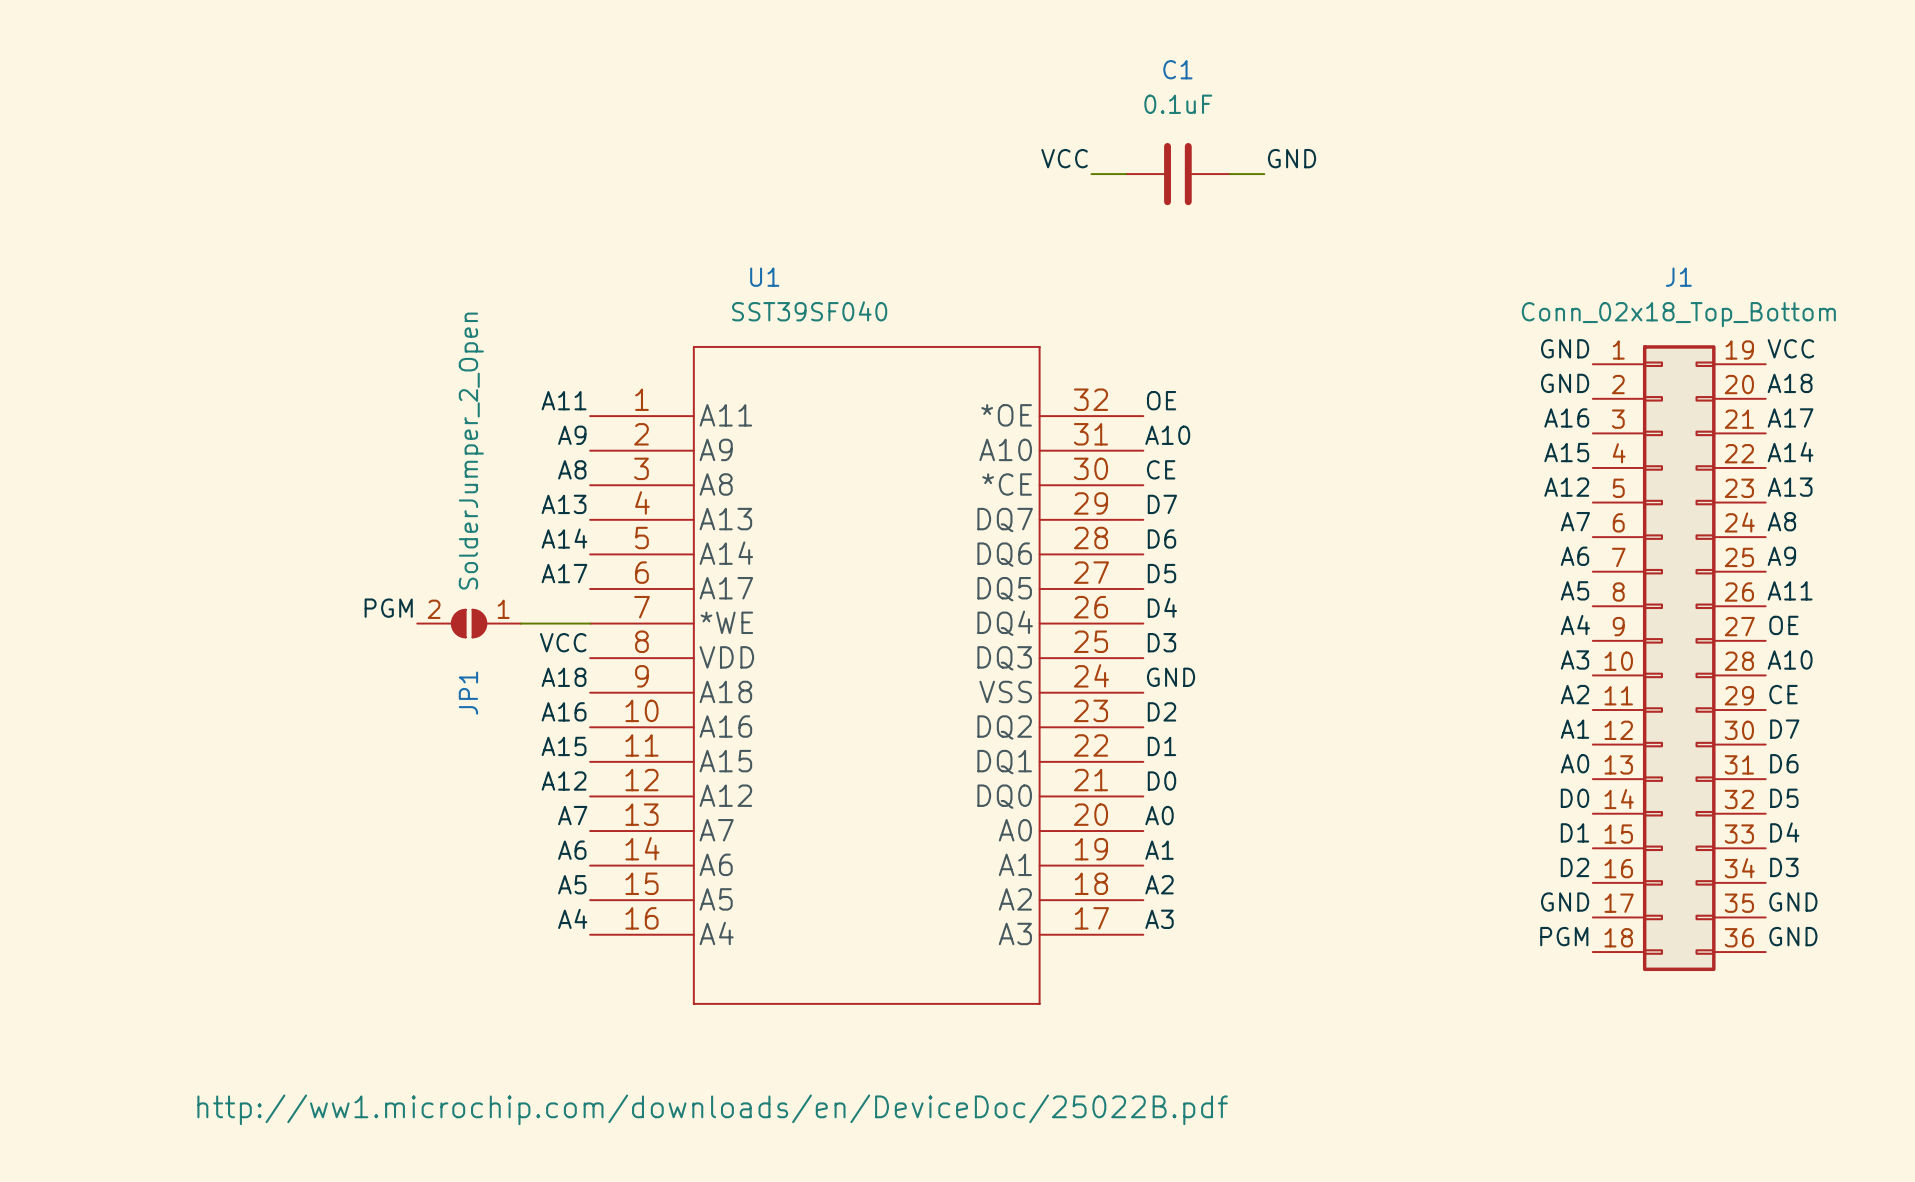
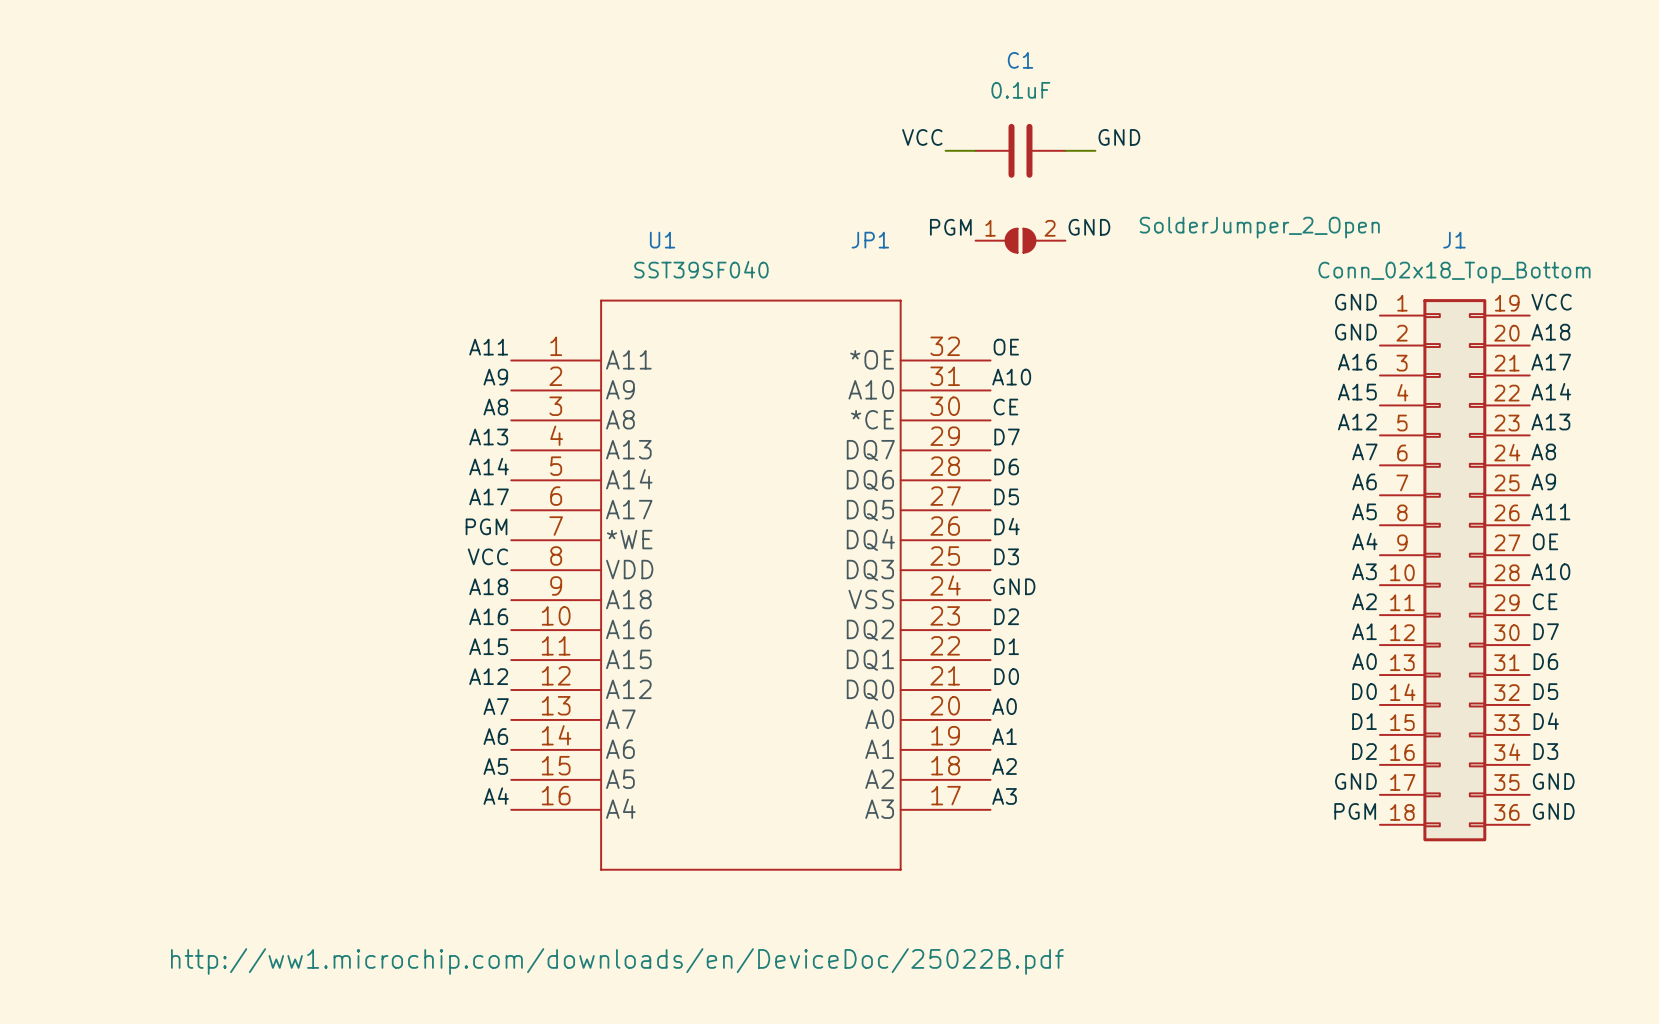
label: none -> PGM (950, 227)
label: none -> GND (1089, 227)
JP1 value position: SolderJumper_2_Open (471, 451) -> SolderJumper_2_Open (1259, 227)
label position: PGM (388, 608) -> PGM (486, 526)
JP1 rotation: 0° (469, 623) -> 180° (1020, 240)
JP1 position: (469, 623) -> (1020, 240)
wire: (520, 623) (590, 623) -> none
JP1 name position: JP1 (468, 693) -> JP1 (870, 240)

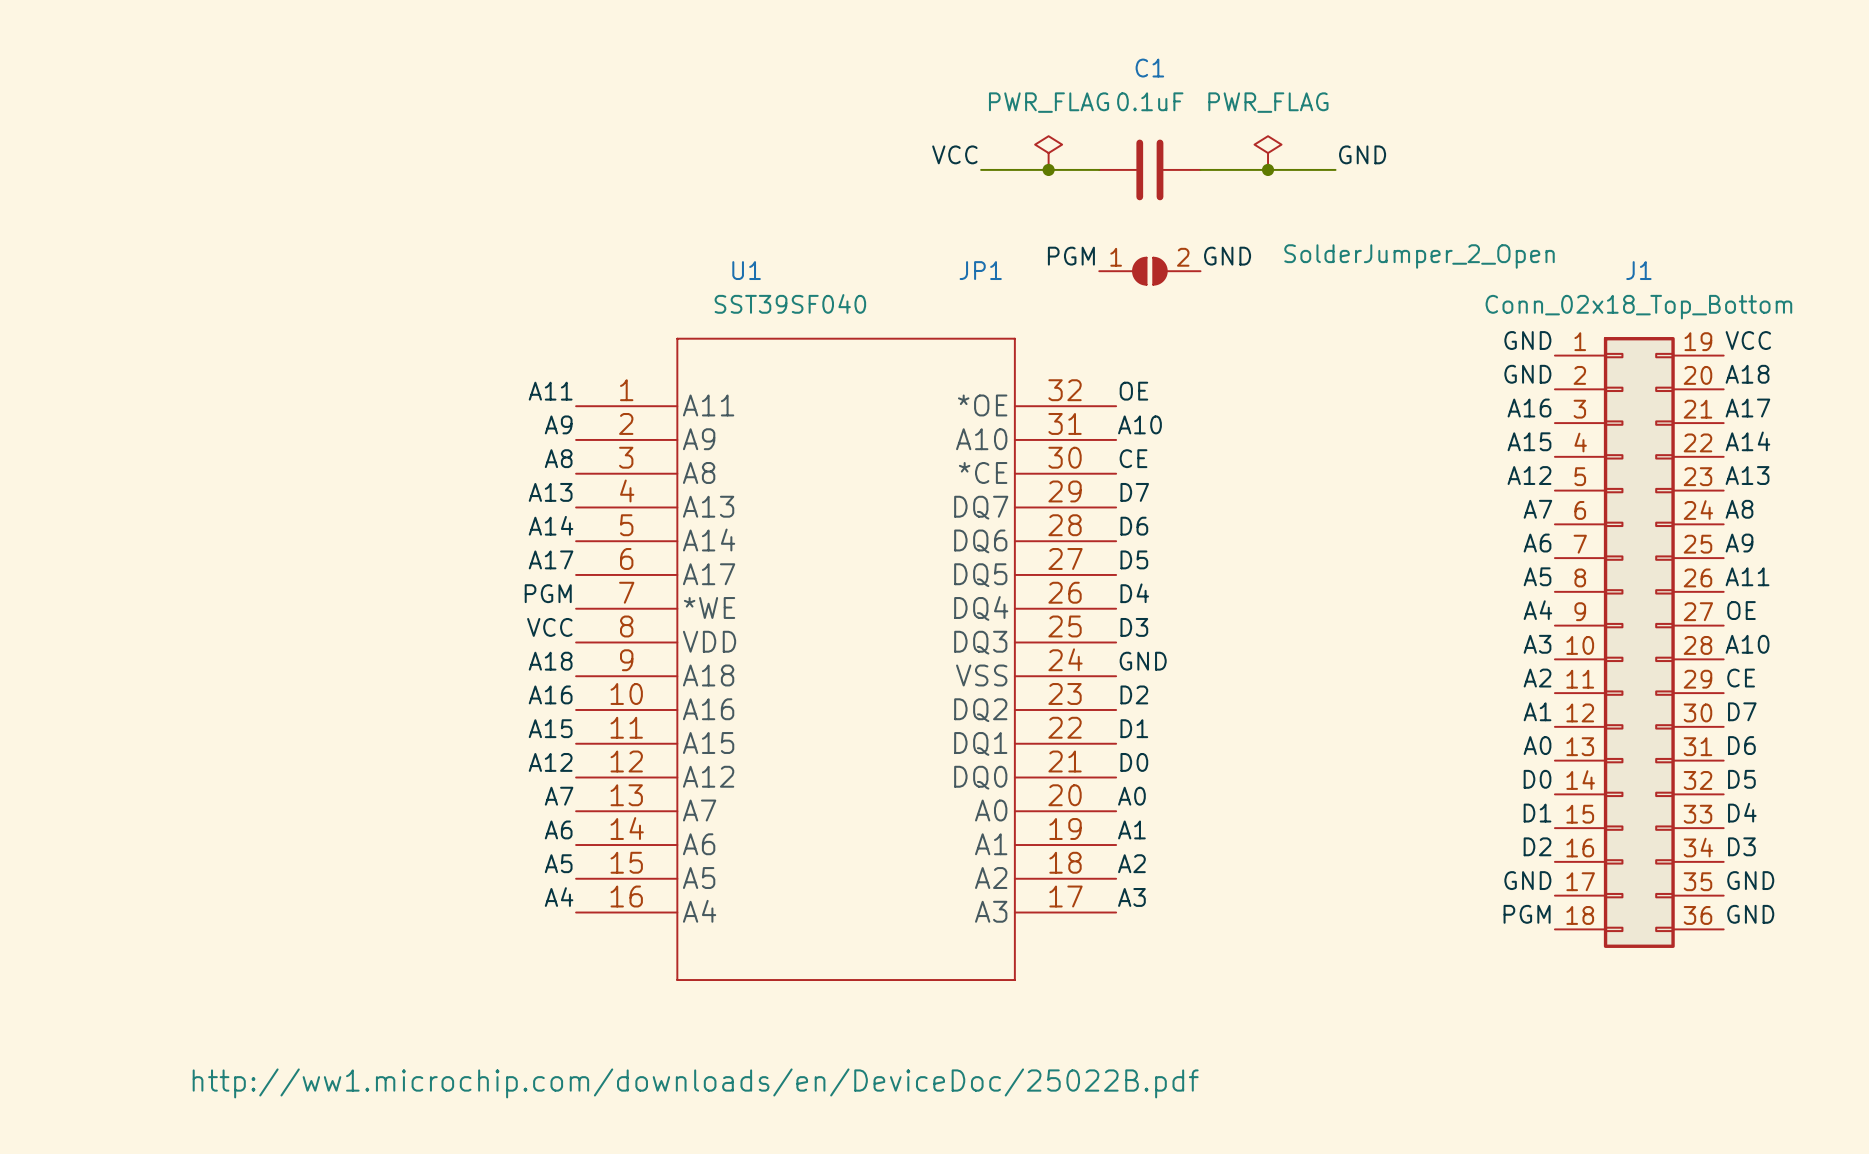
power symbol: none -> PWR_FLAG (1048, 153)
power symbol: none -> PWR_FLAG (1268, 153)
label position: VCC (922, 137) -> VCC (954, 154)
label position: GND (1119, 137) -> GND (1362, 154)
wire: none -> (981, 169) (1065, 169)
junction: none -> (1048, 169)
wire: none -> (1234, 169) (1335, 169)
junction: none -> (1268, 169)

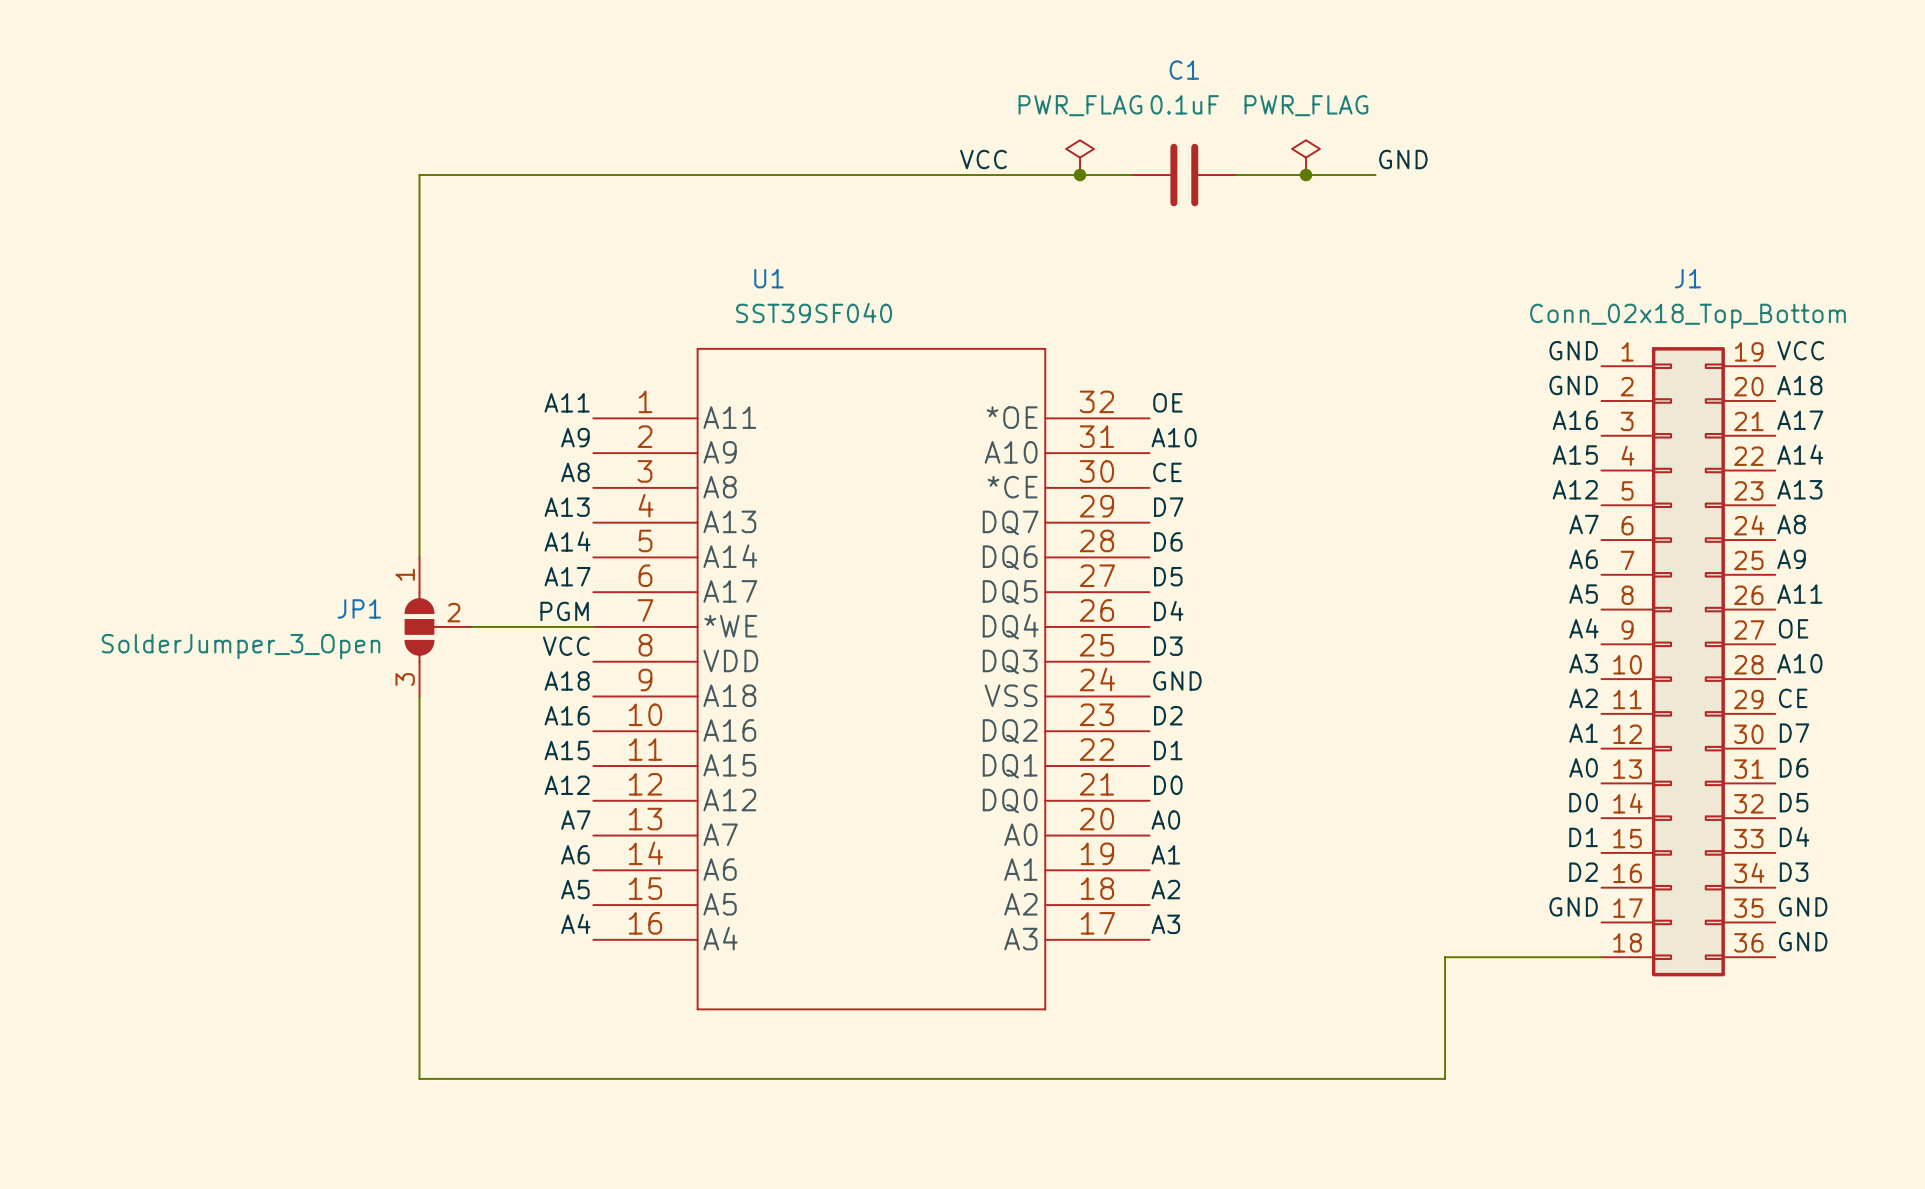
wire: none -> (1010, 175) (419, 175) (419, 557)
label: PGM (1071, 256) -> none
label: GND (1227, 256) -> none
JP1 value: SolderJumper_2_Open (1419, 256) -> SolderJumper_3_Open (241, 646)
JP1 symbol: [1099, 257, 1201, 285] -> [405, 557, 472, 697]
JP1 name position: JP1 (980, 270) -> JP1 (359, 608)
wire: none -> (471, 626) (593, 626)
wire: none -> (419, 696) (419, 1078) (1445, 1078) (1445, 957) (1601, 957)
label: PGM (1527, 914) -> none
U1 text: http://ww1.microchip.com/downloads/en/DeviceDoc/25022B.pdf (695, 1083) -> none

